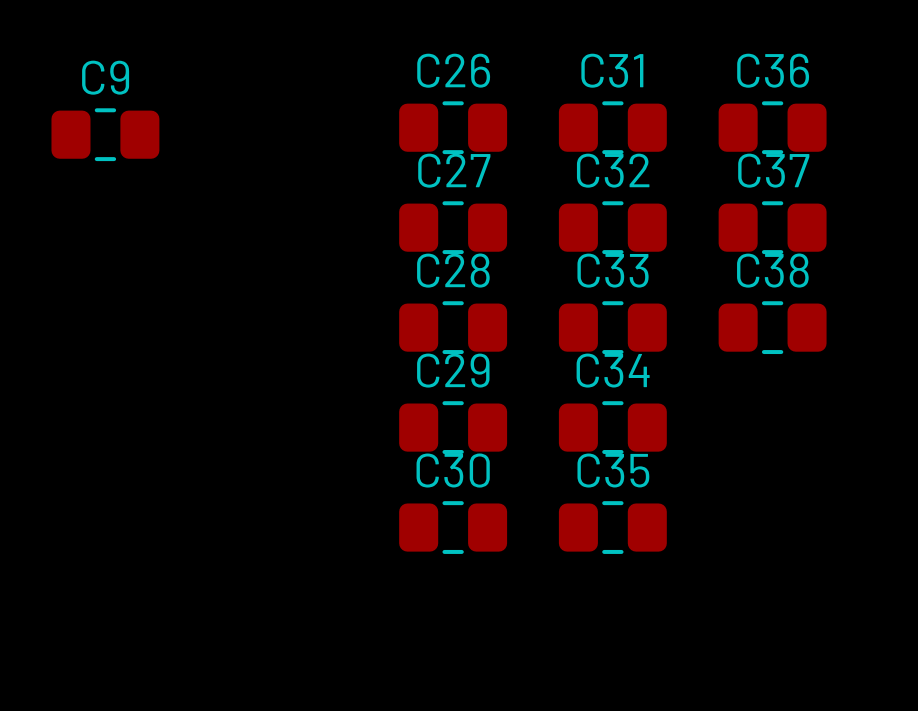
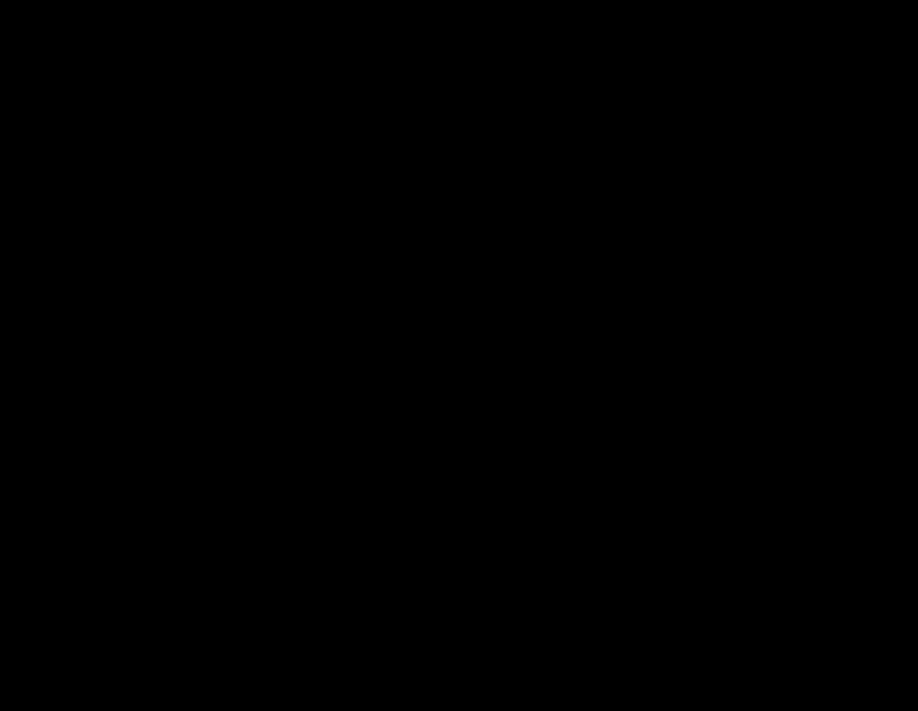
C26: (453, 127) -> none
C31: (612, 127) -> none
C36: (772, 127) -> none
C9: (105, 134) -> none
C27: (453, 227) -> none
C32: (612, 227) -> none
C37: (772, 227) -> none
C28: (453, 327) -> none
C33: (612, 327) -> none
C38: (772, 327) -> none
C29: (453, 427) -> none
C34: (612, 427) -> none
C30: (453, 527) -> none
C35: (612, 527) -> none

